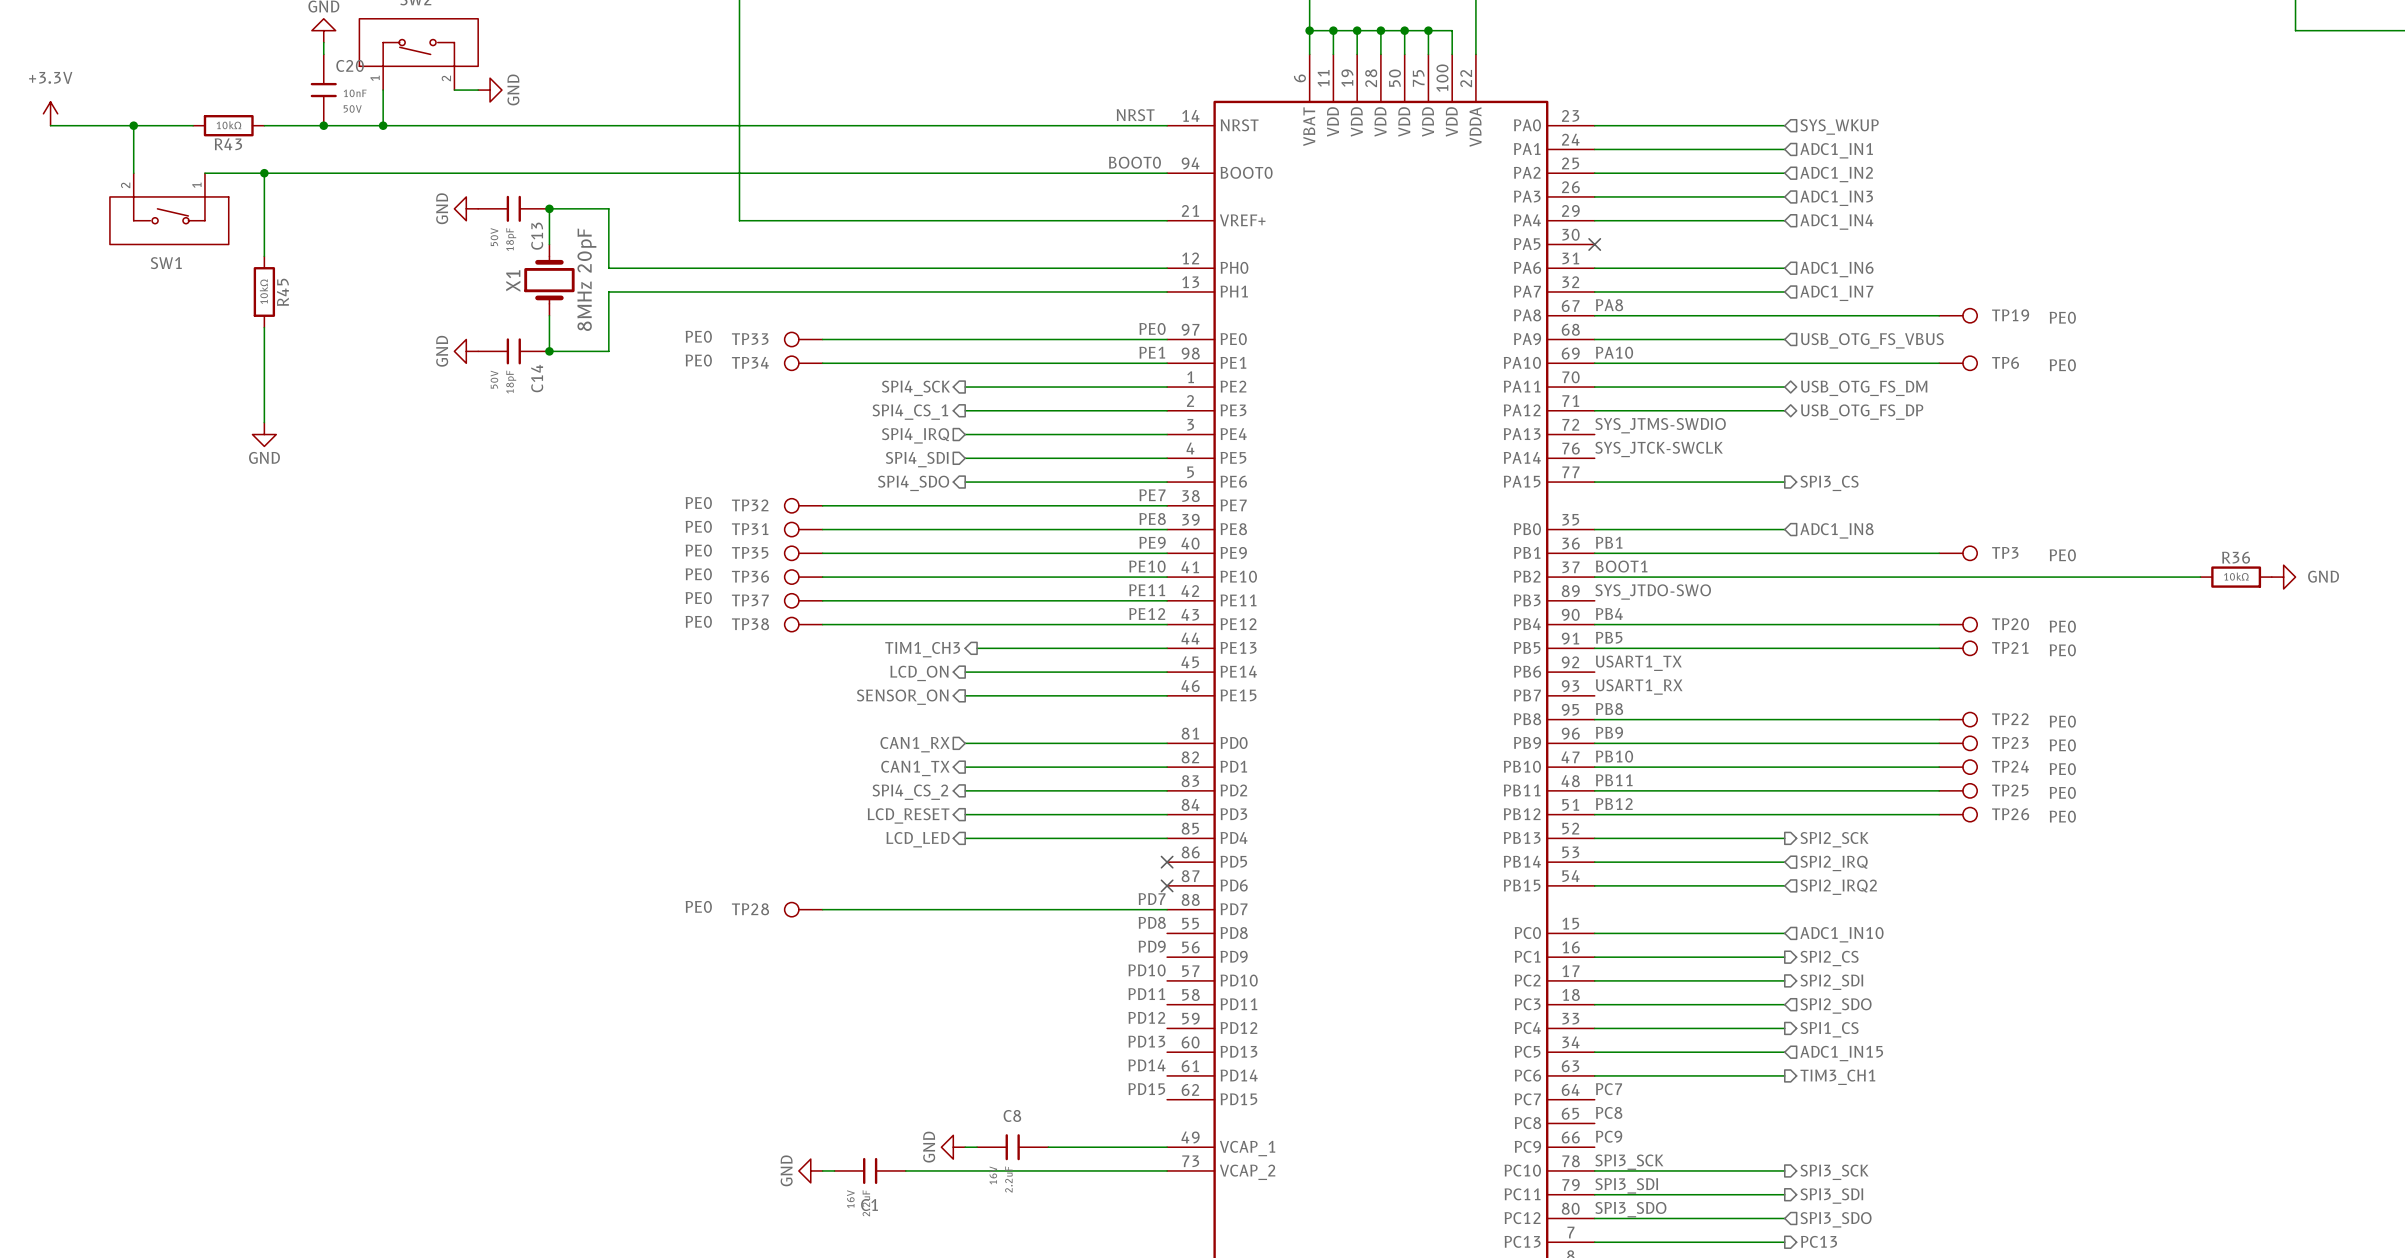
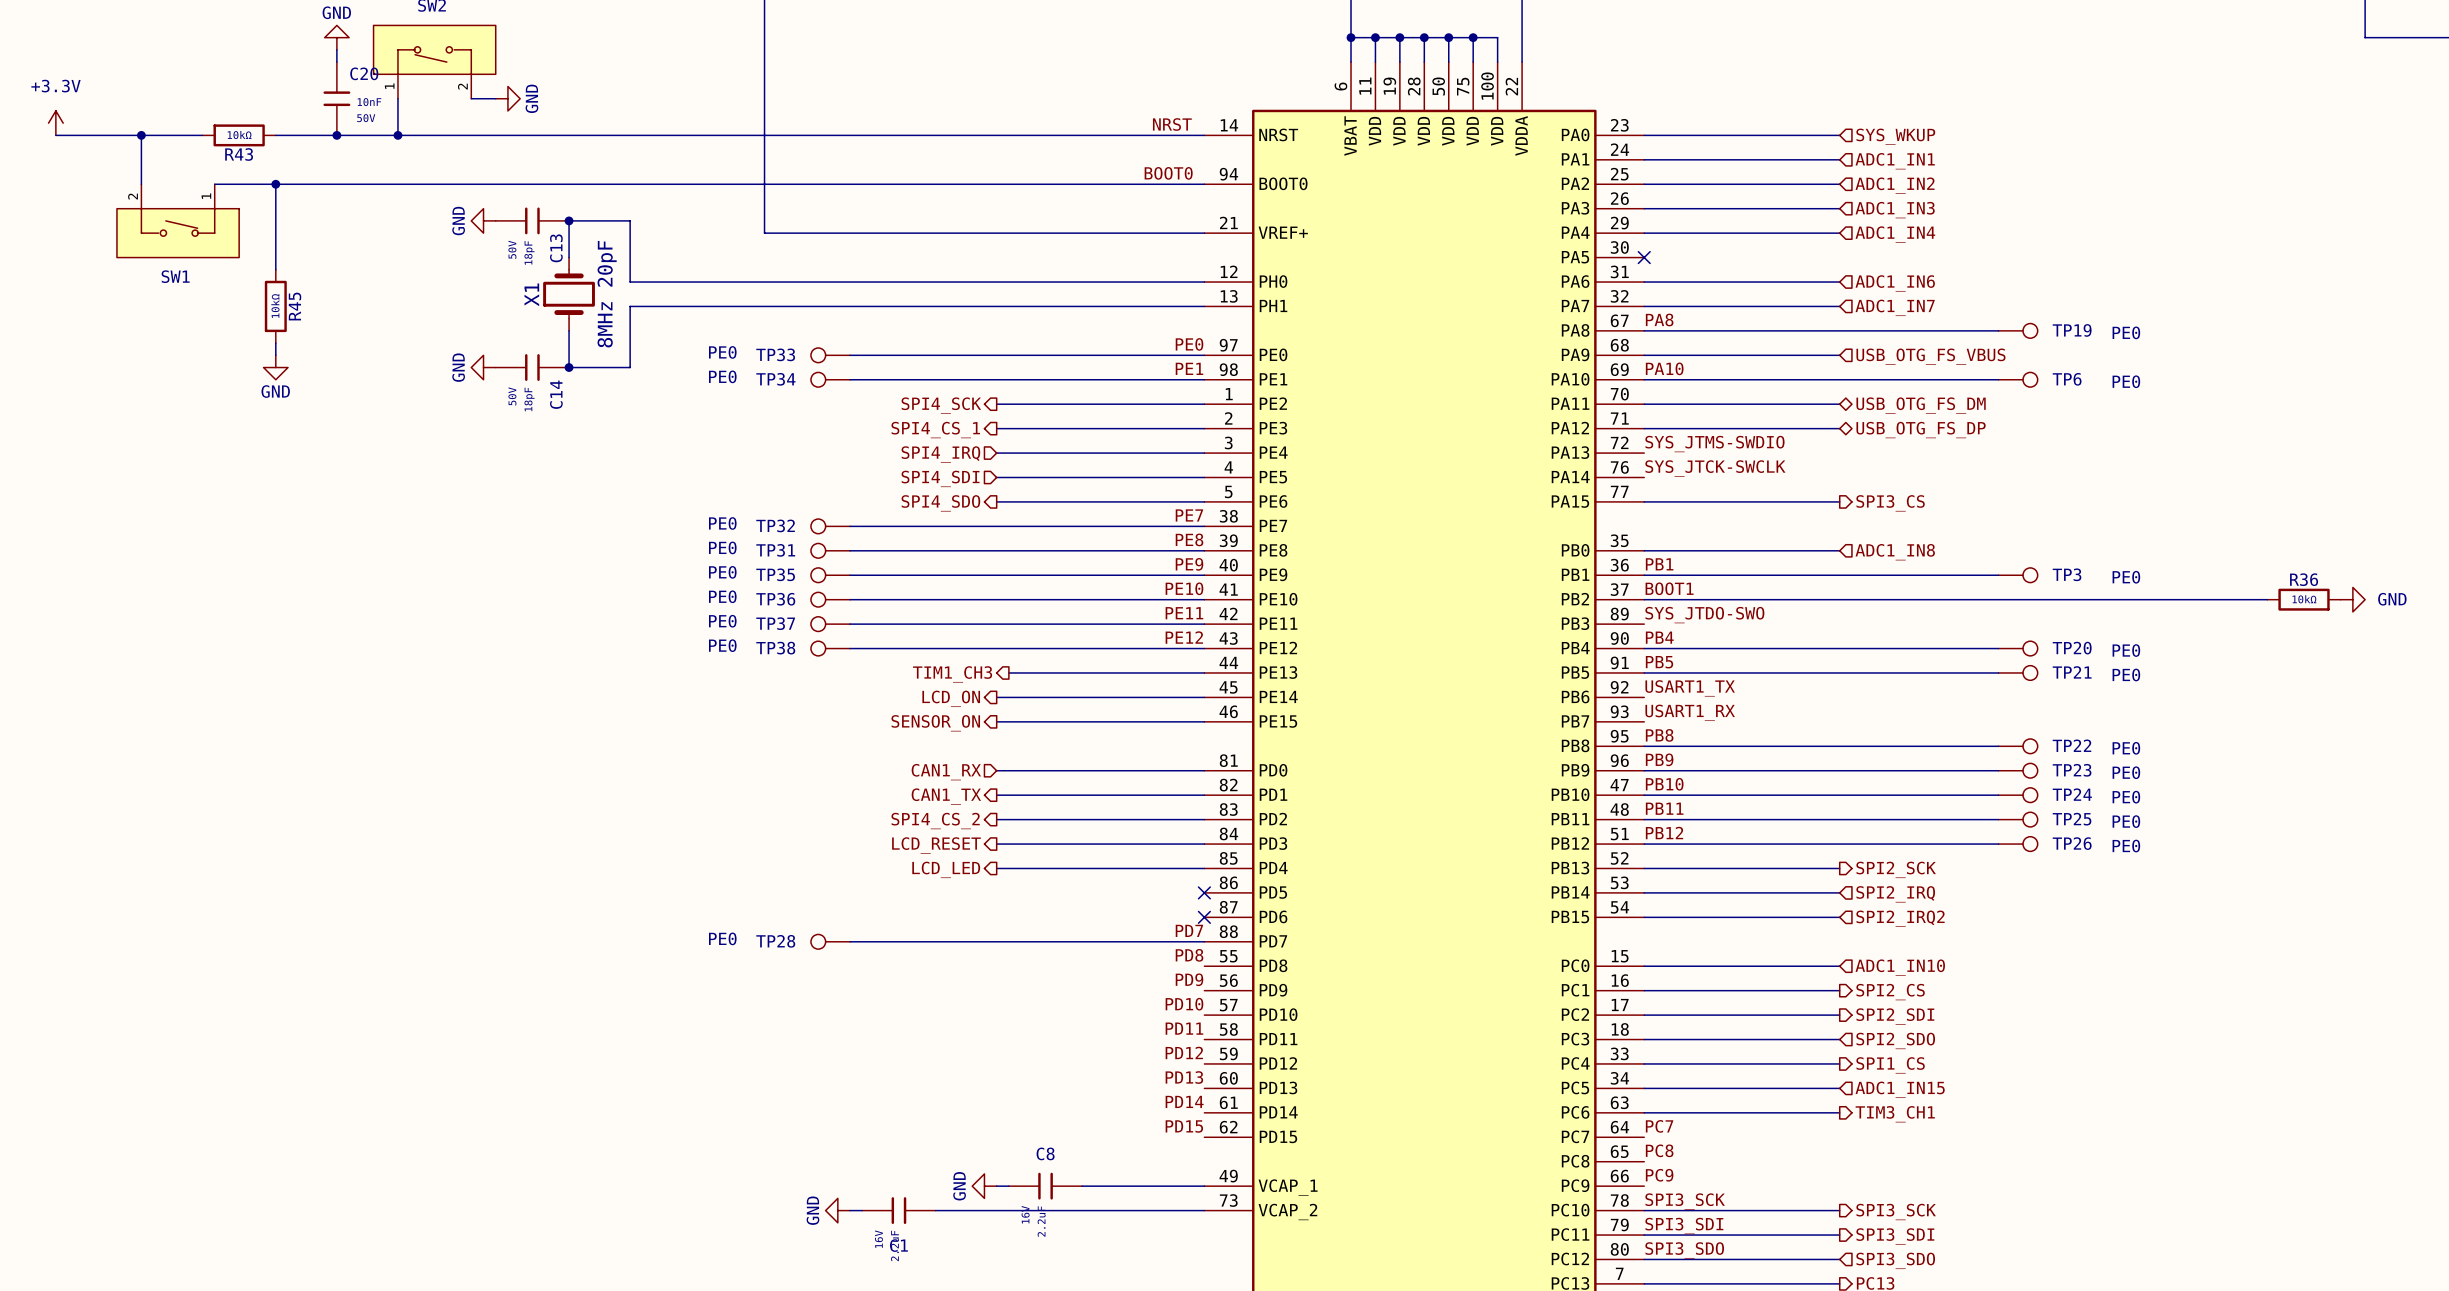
wire: (264, 339) (264, 422) -> none
power symbol position: GND (264, 434) -> GND (275, 367)

